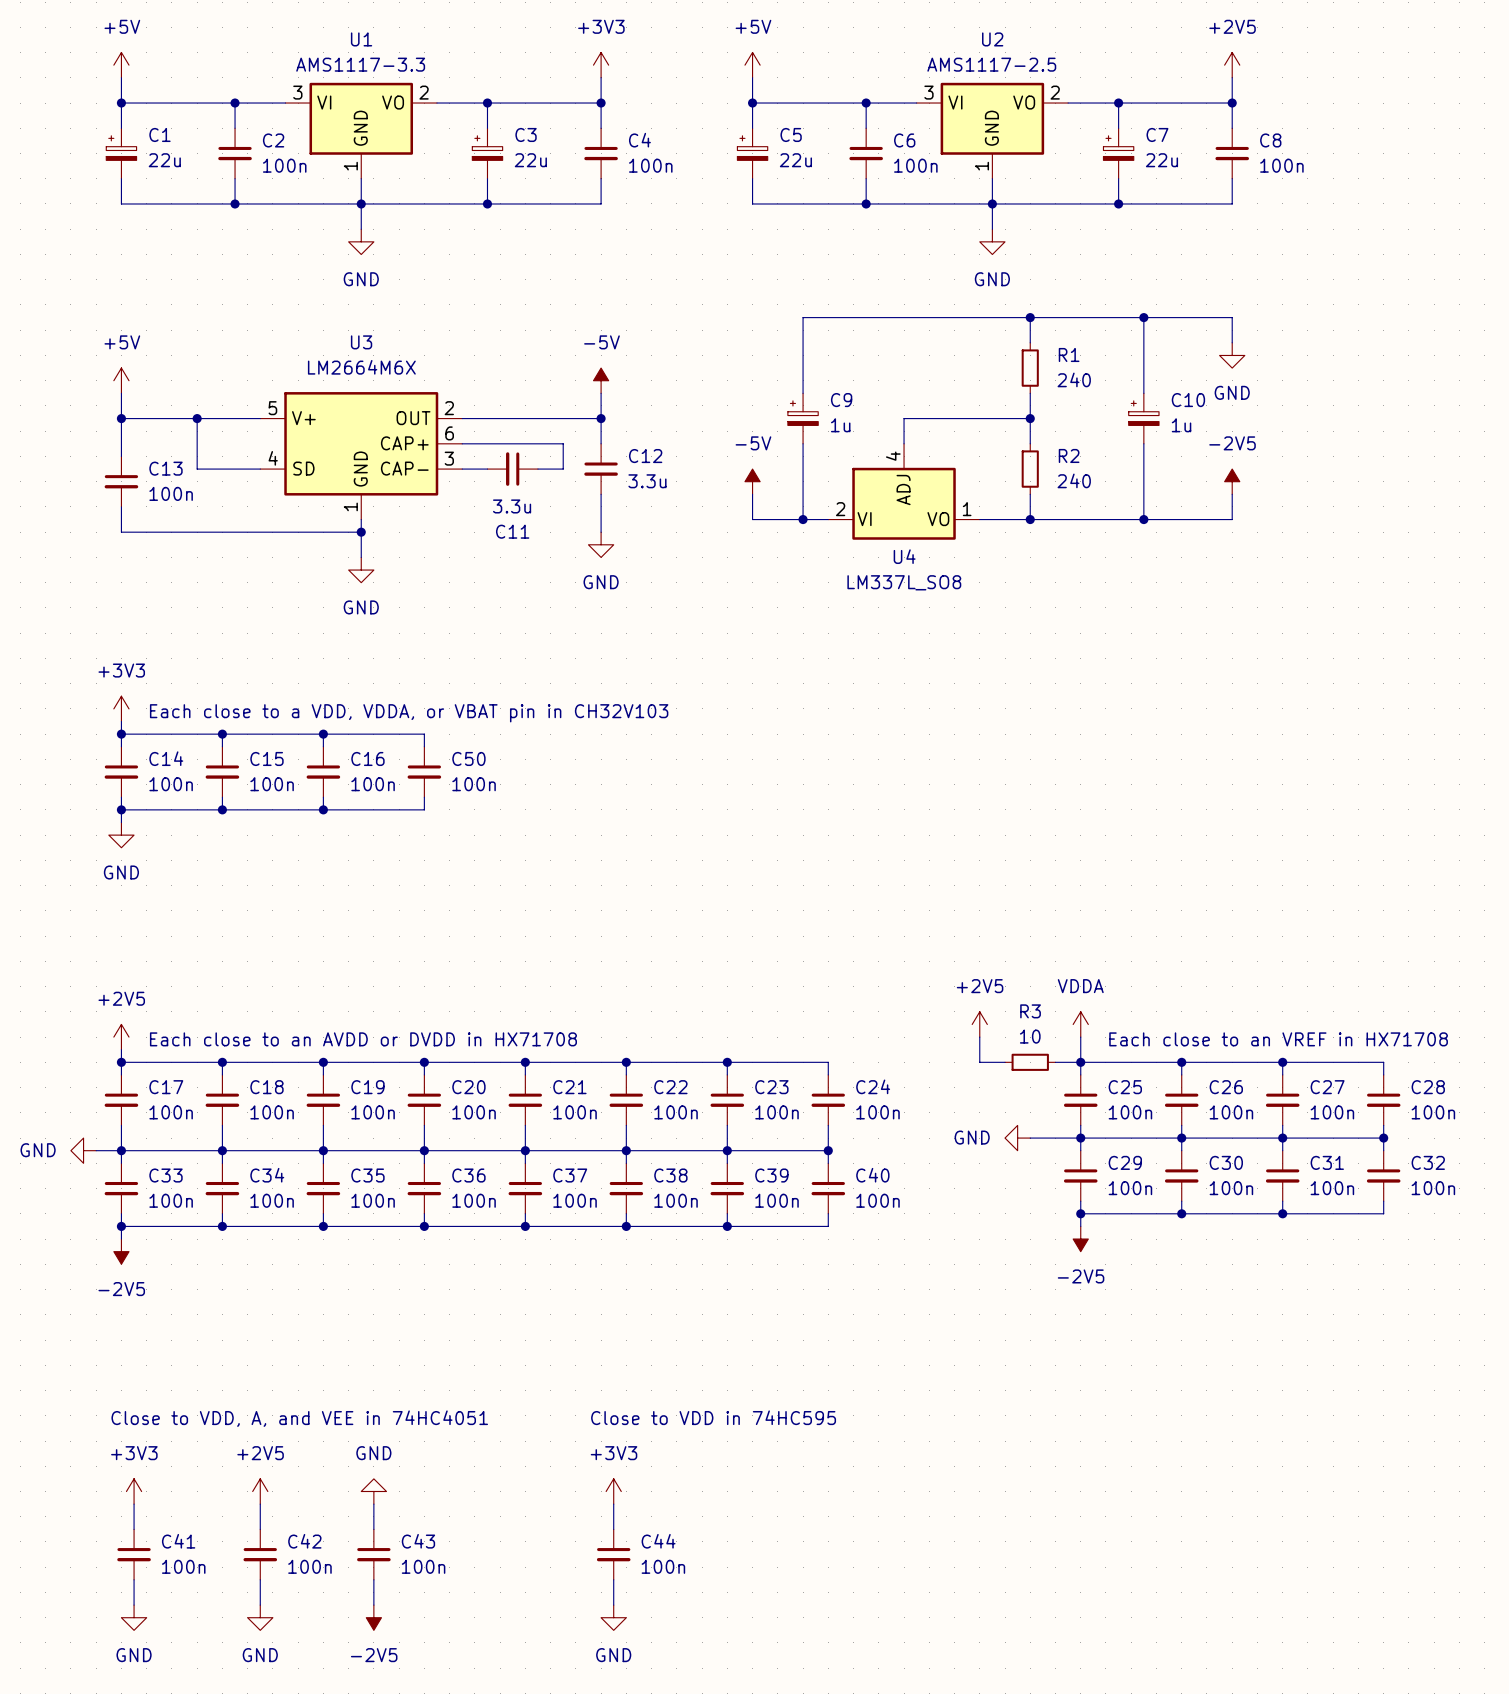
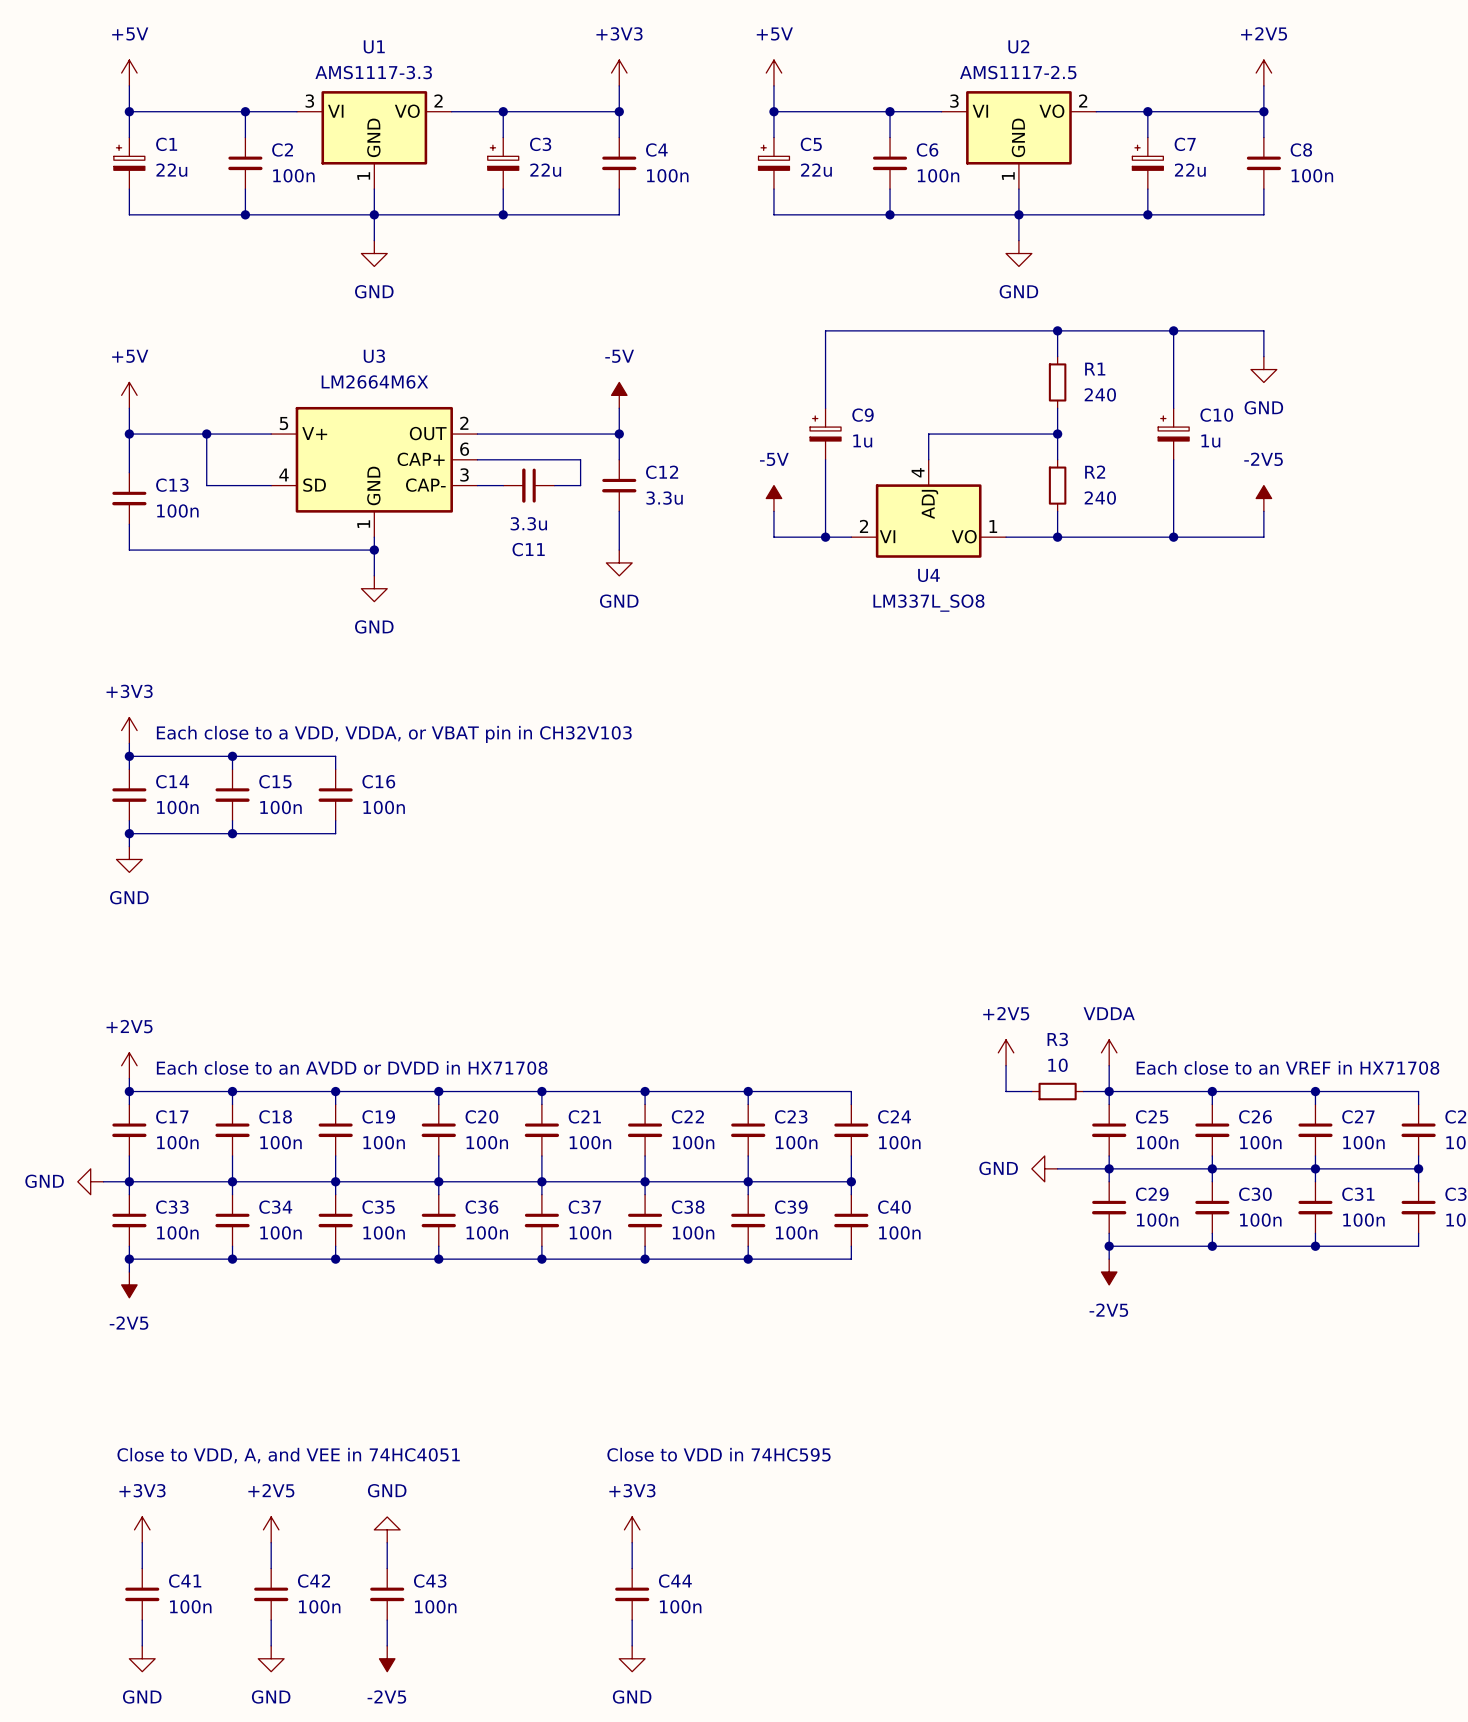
wire: (323, 734) (424, 734) (424, 746) -> none
junction: (323, 734) -> none
C50: 100n (424, 772) -> none
wire: (424, 797) (424, 809) (323, 809) -> none
junction: (323, 809) -> none

